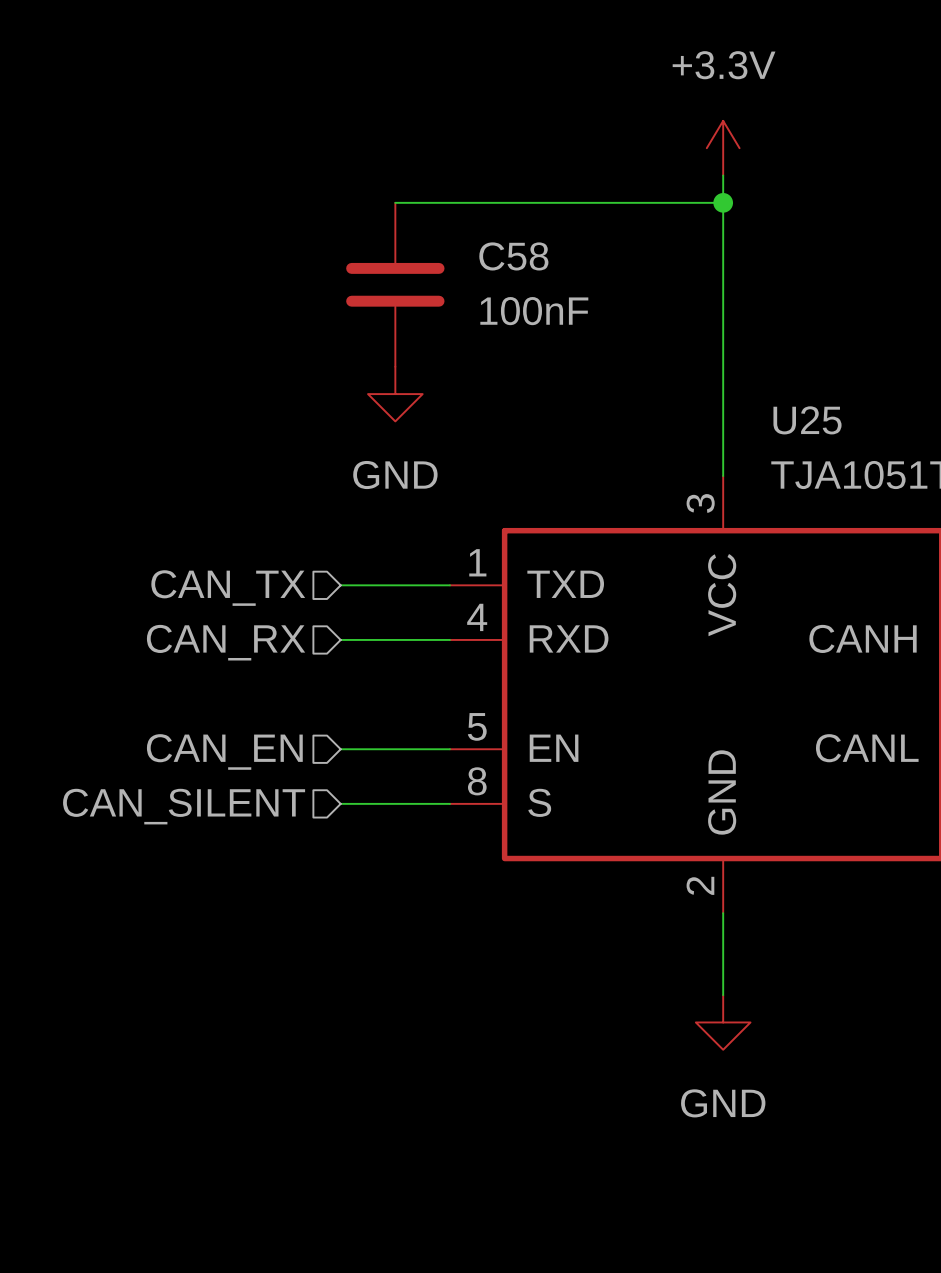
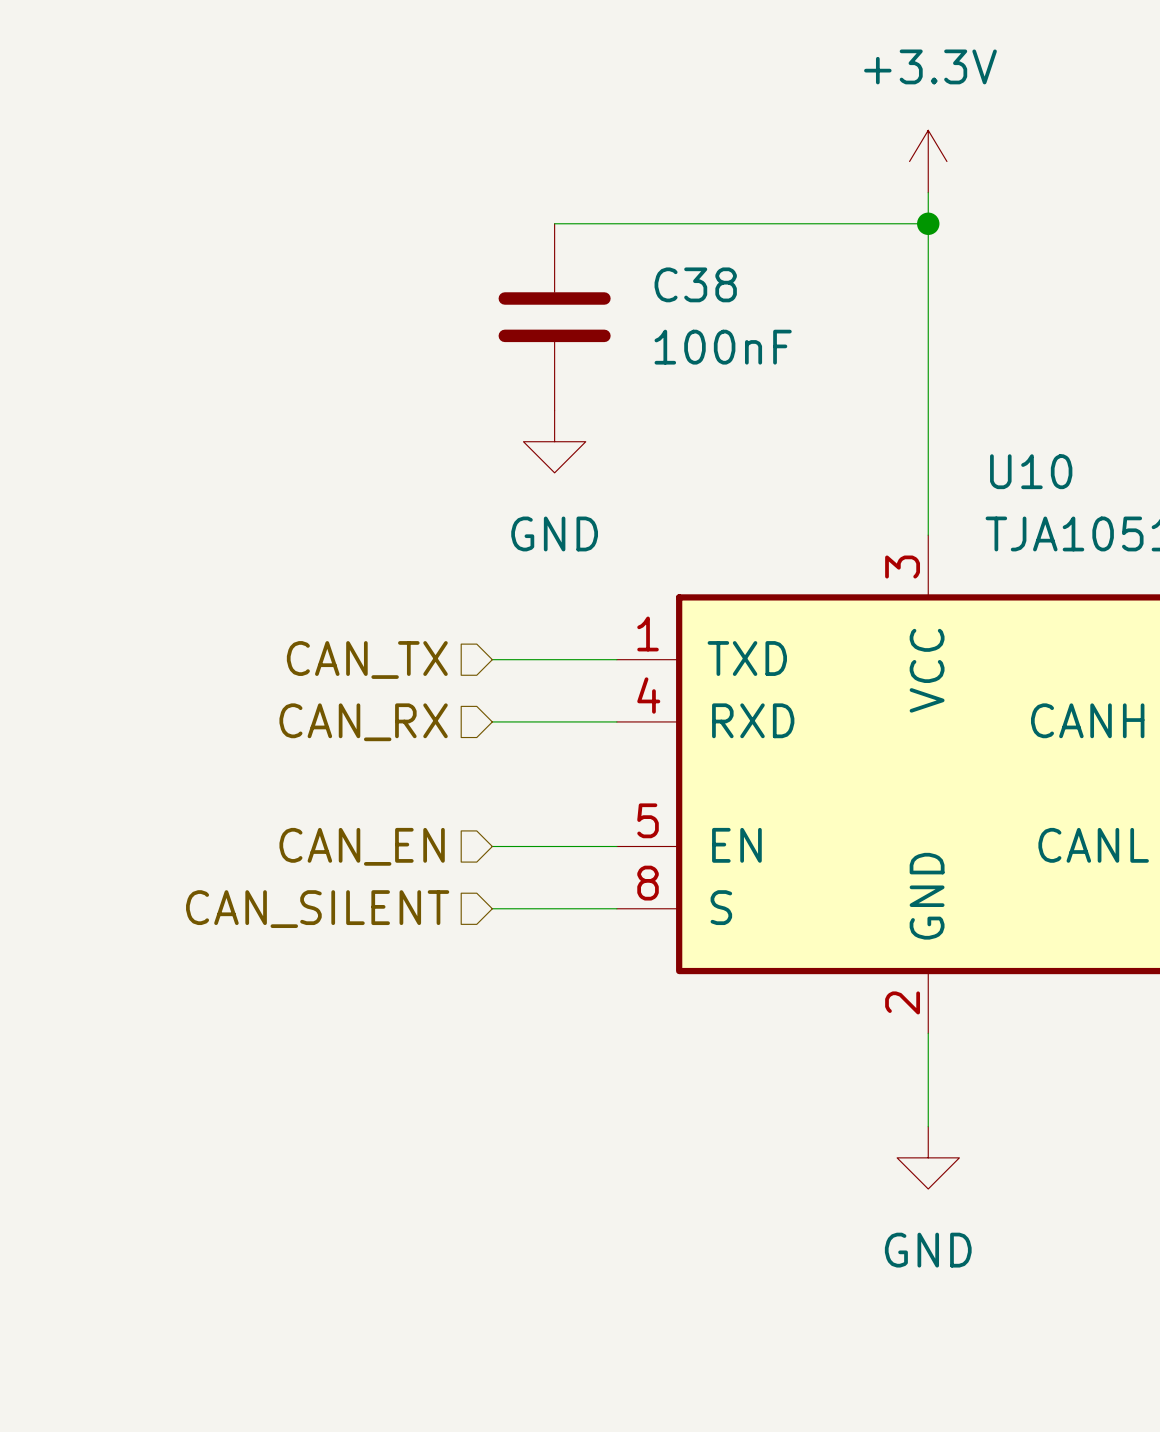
C58 name: C58 (513, 256) -> C38 (695, 284)
U25 name: U25 (807, 420) -> U10 (1031, 471)

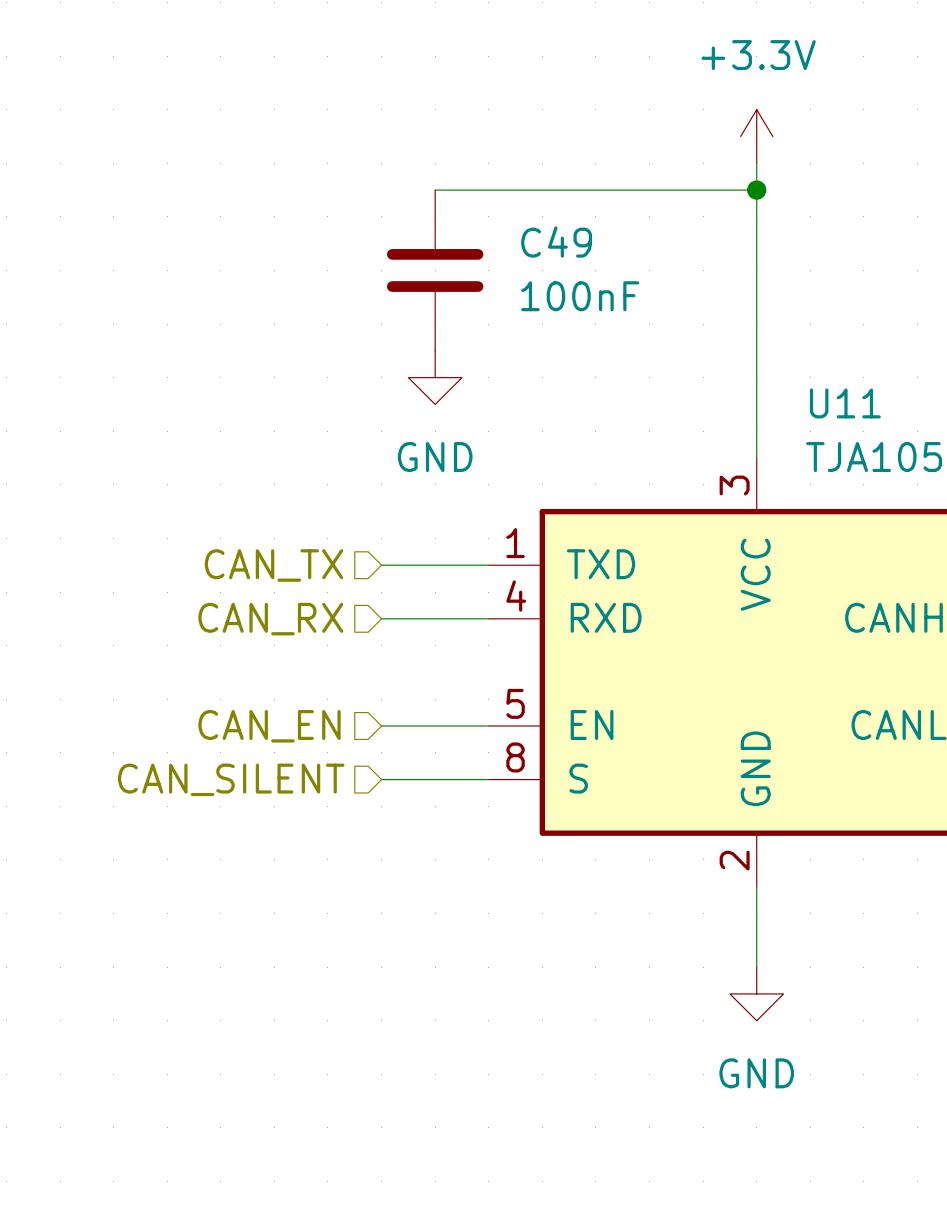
C38 name: C38 (695, 284) -> C49 (556, 242)
U10 name: U10 (1031, 471) -> U11 (845, 403)

